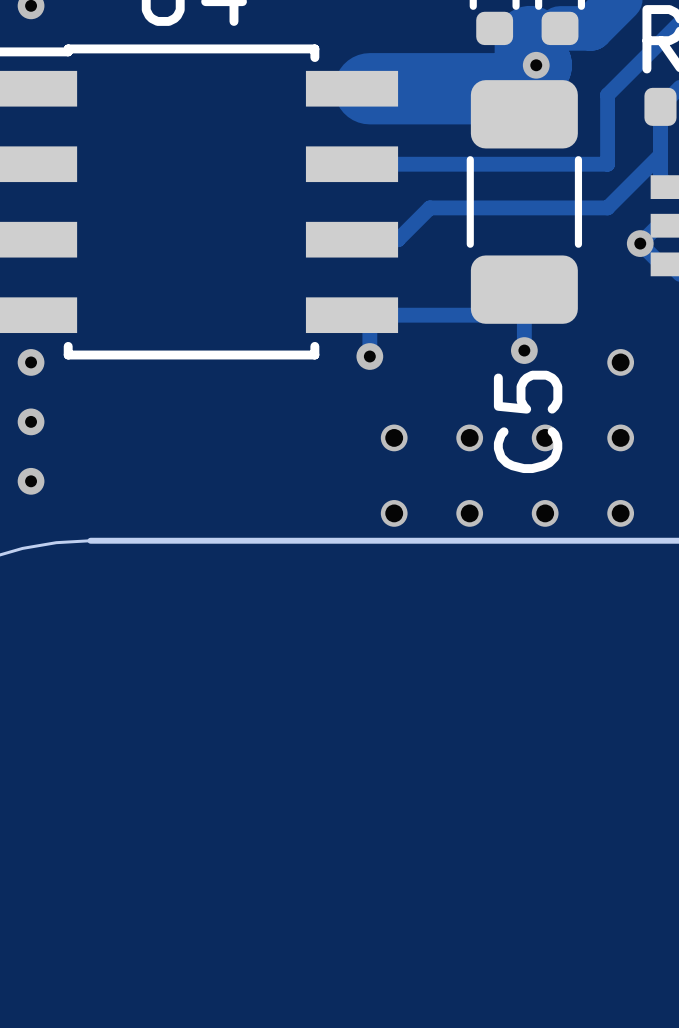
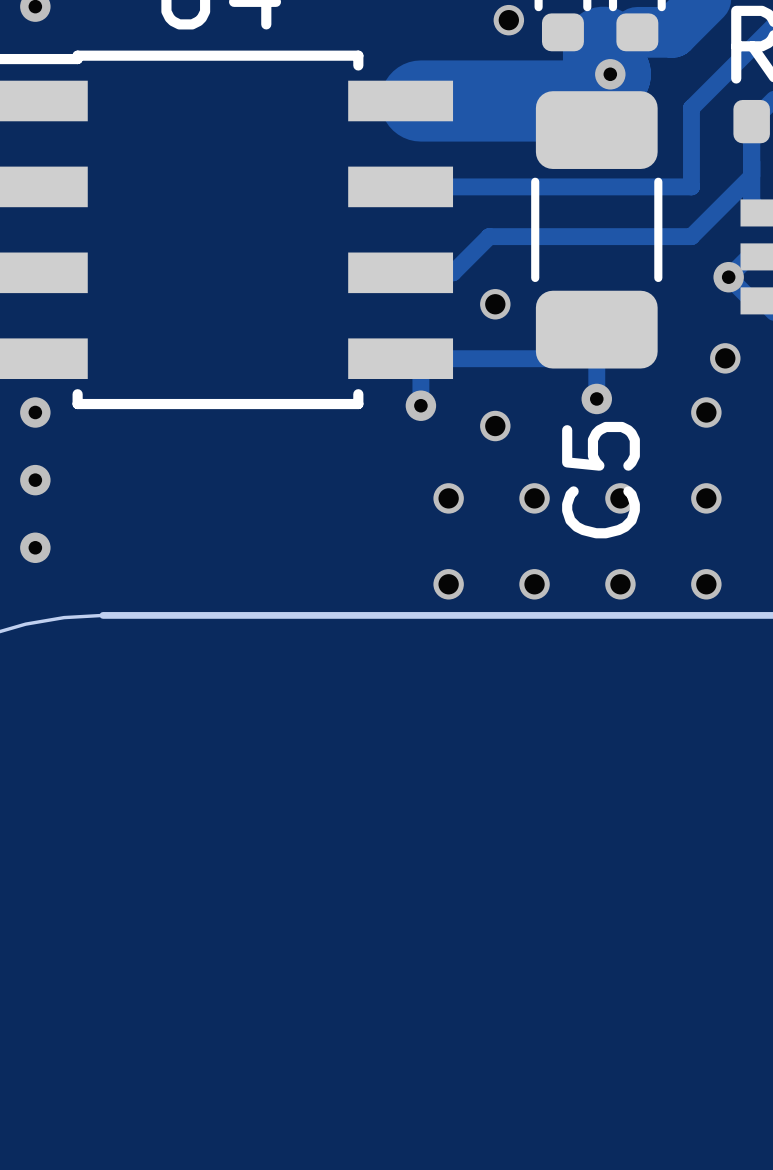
via: none -> (508, 20)
via: none -> (495, 304)
via: none -> (725, 358)
via: none -> (495, 426)

